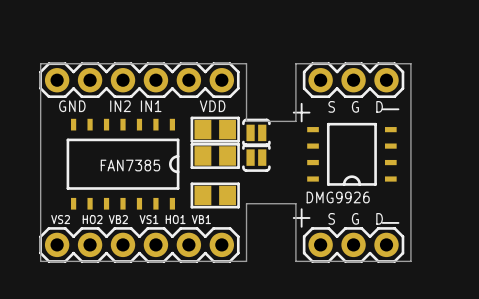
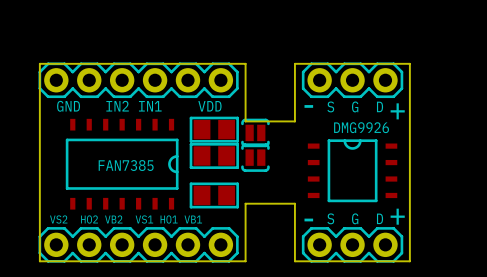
text: none -> - (308, 106)
text: - (390, 109) -> none
text: + (301, 112) -> none
text: none -> + (397, 111)
part rotation: 0° (351, 154) -> 180° (352, 170)
text position: DMG9926 (338, 197) -> DMG9926 (361, 127)
text: + (301, 218) -> none
text: none -> + (397, 216)
text: none -> - (308, 220)
text: - (390, 222) -> none

